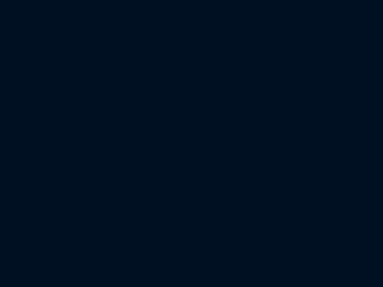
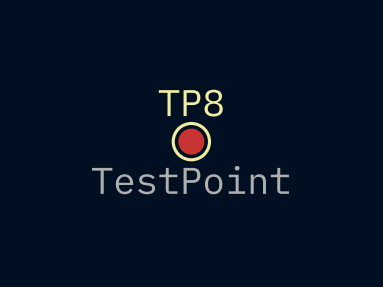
TP8: none -> TestPoint (191, 141)

